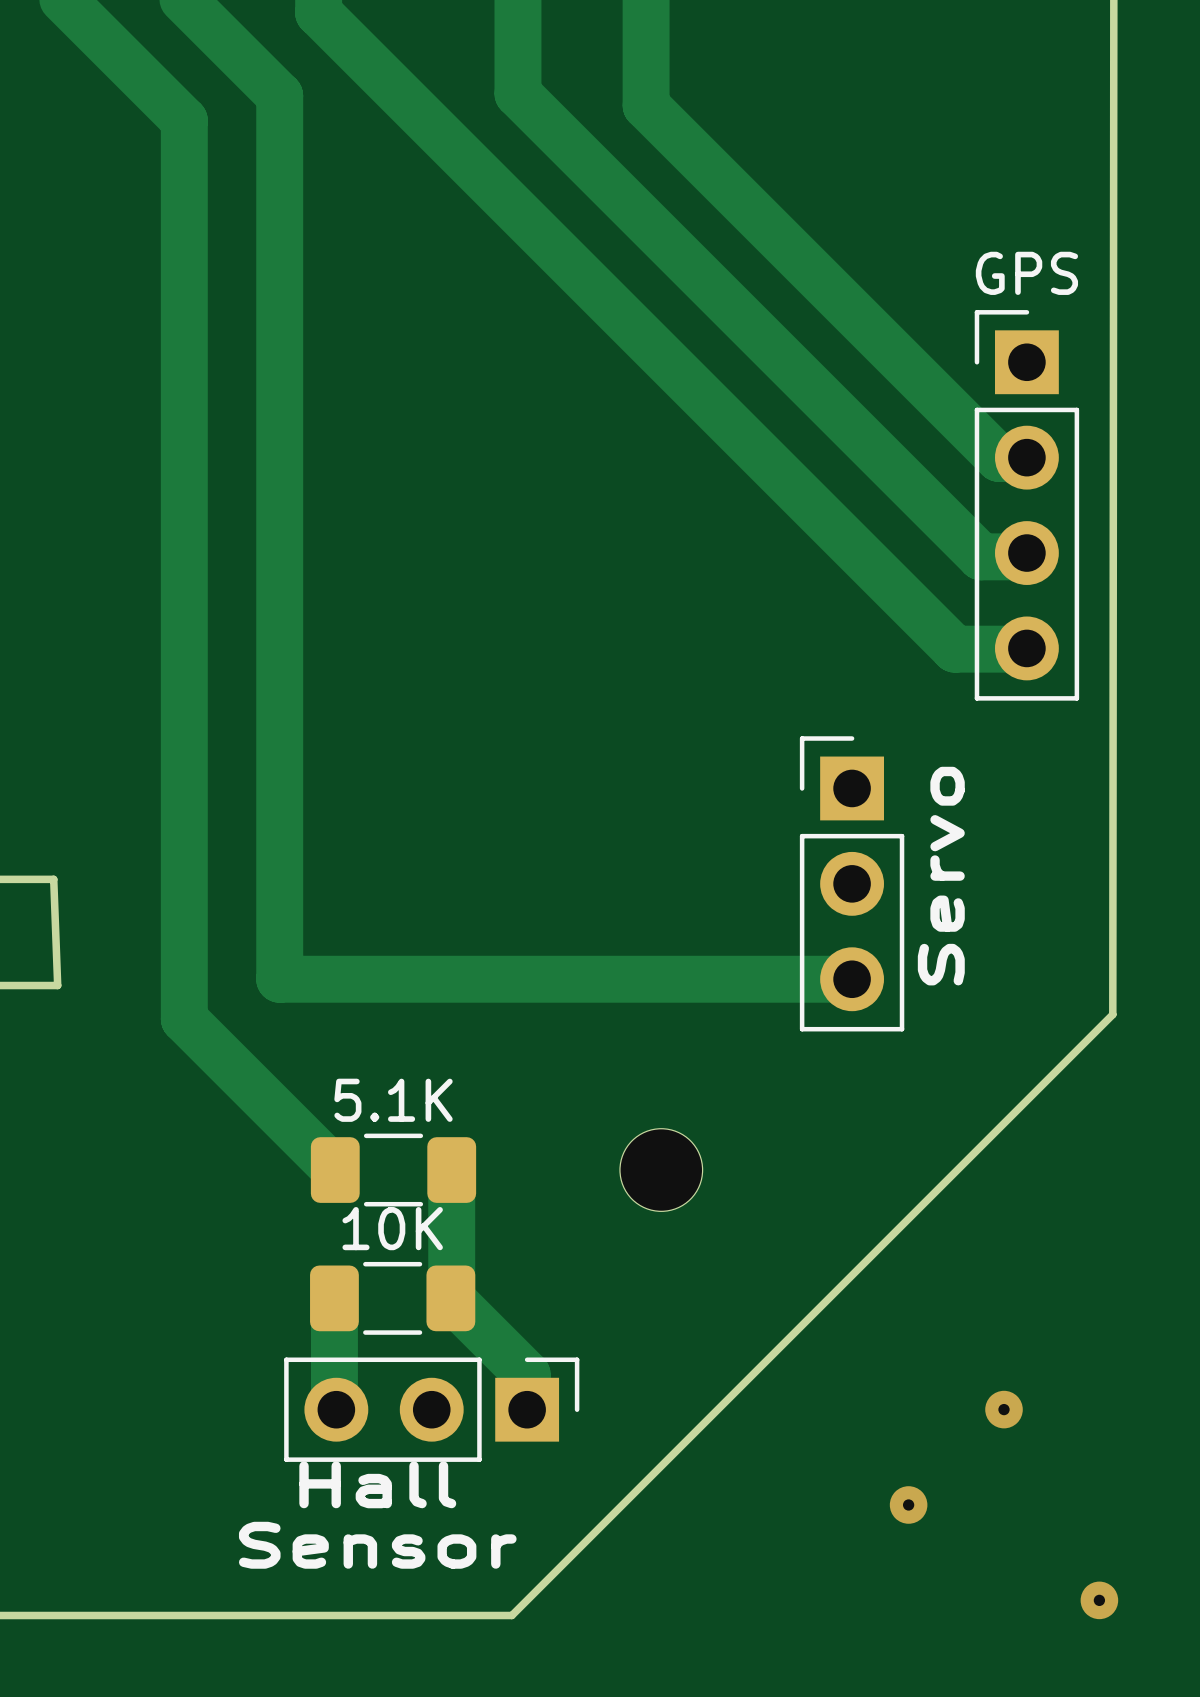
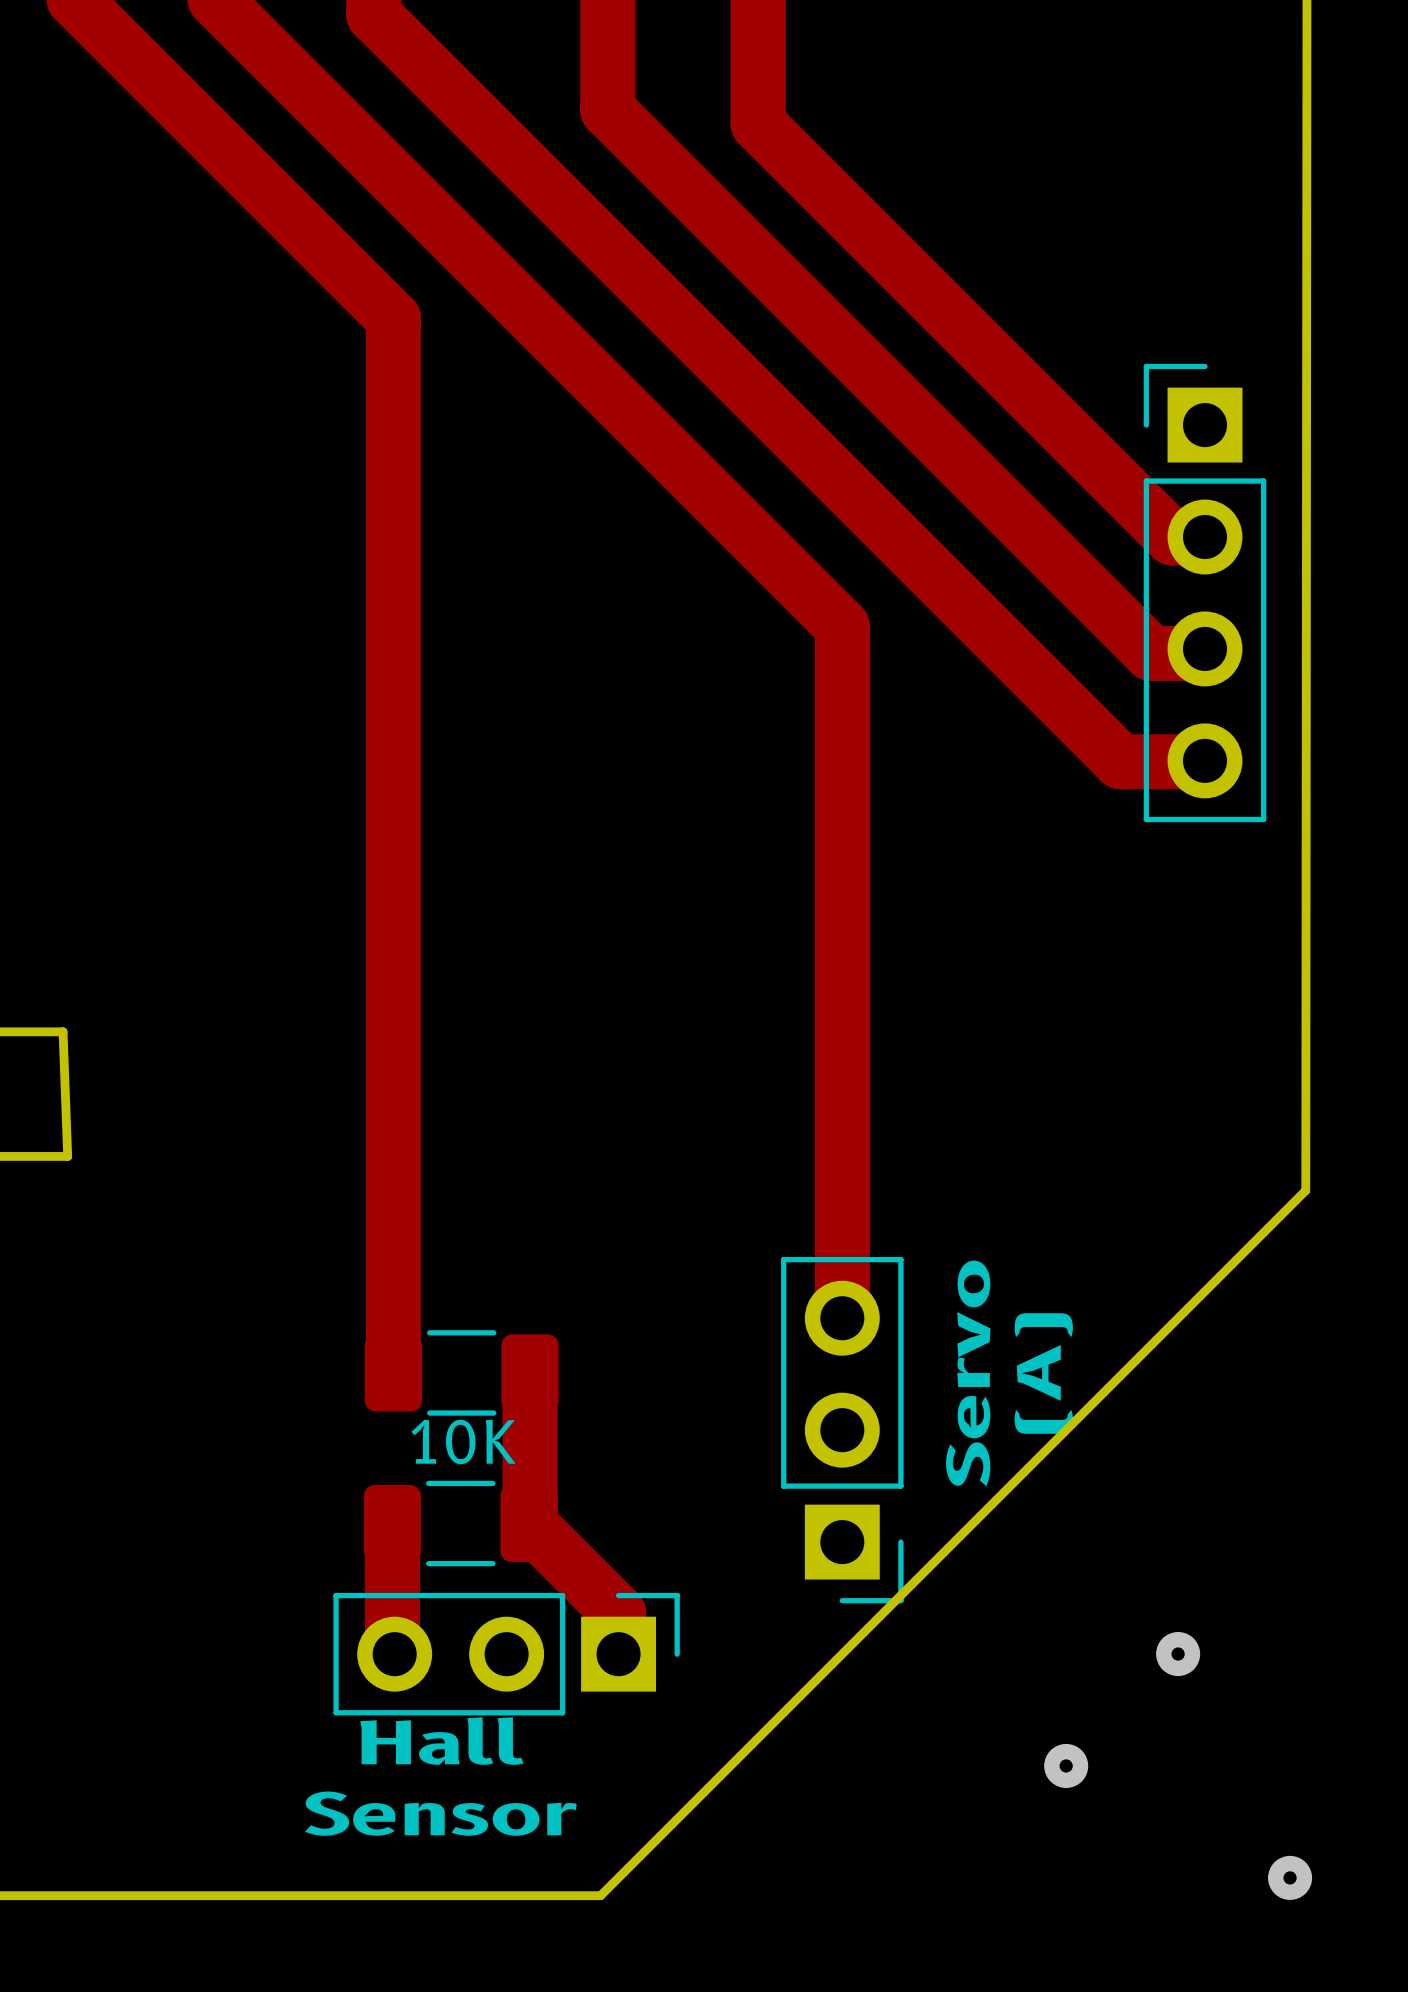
track: (279, 95) (279, 979) (852, 979) -> (328, 112) (842, 626) (842, 1318)
track: (184, 120) (184, 1019) (335, 1170) -> (216, 141) (393, 318) (393, 1372)
GPS name: GPS (1026, 273) -> none
text position: Servo (941, 876) -> Servo (968, 1373)
part rotation: 0° (852, 883) -> 180° (842, 1430)
part position: (852, 883) -> (842, 1430)
5.1K name: 5.1K (393, 1100) -> none
part: (661, 1170) -> none
text: none -> (A) (1043, 1373)

